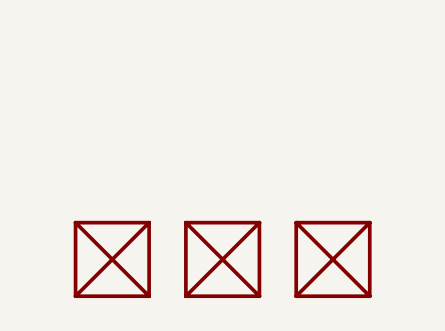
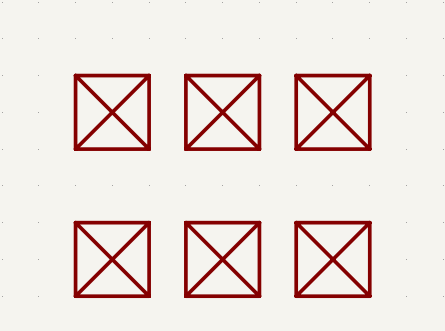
part: none -> (112, 112)
part: none -> (222, 112)
part: none -> (332, 112)

